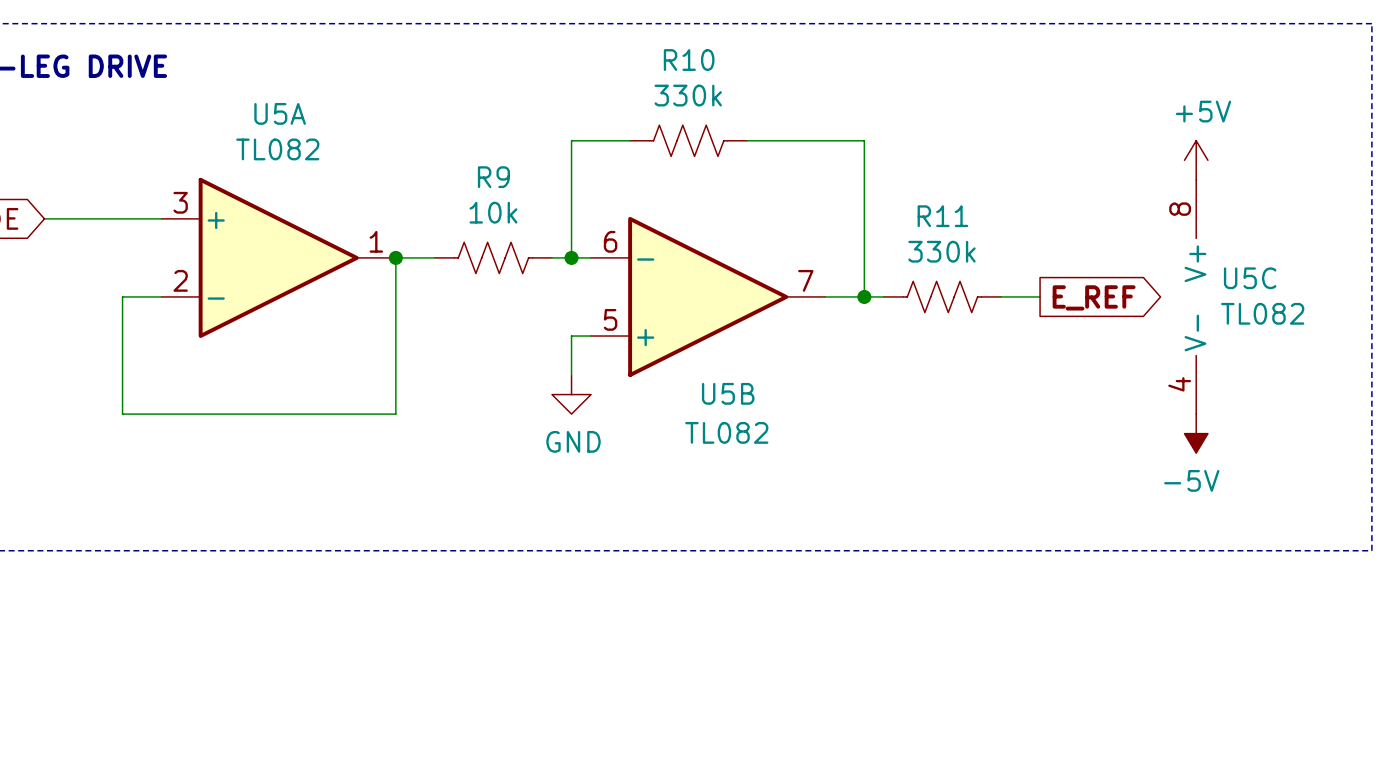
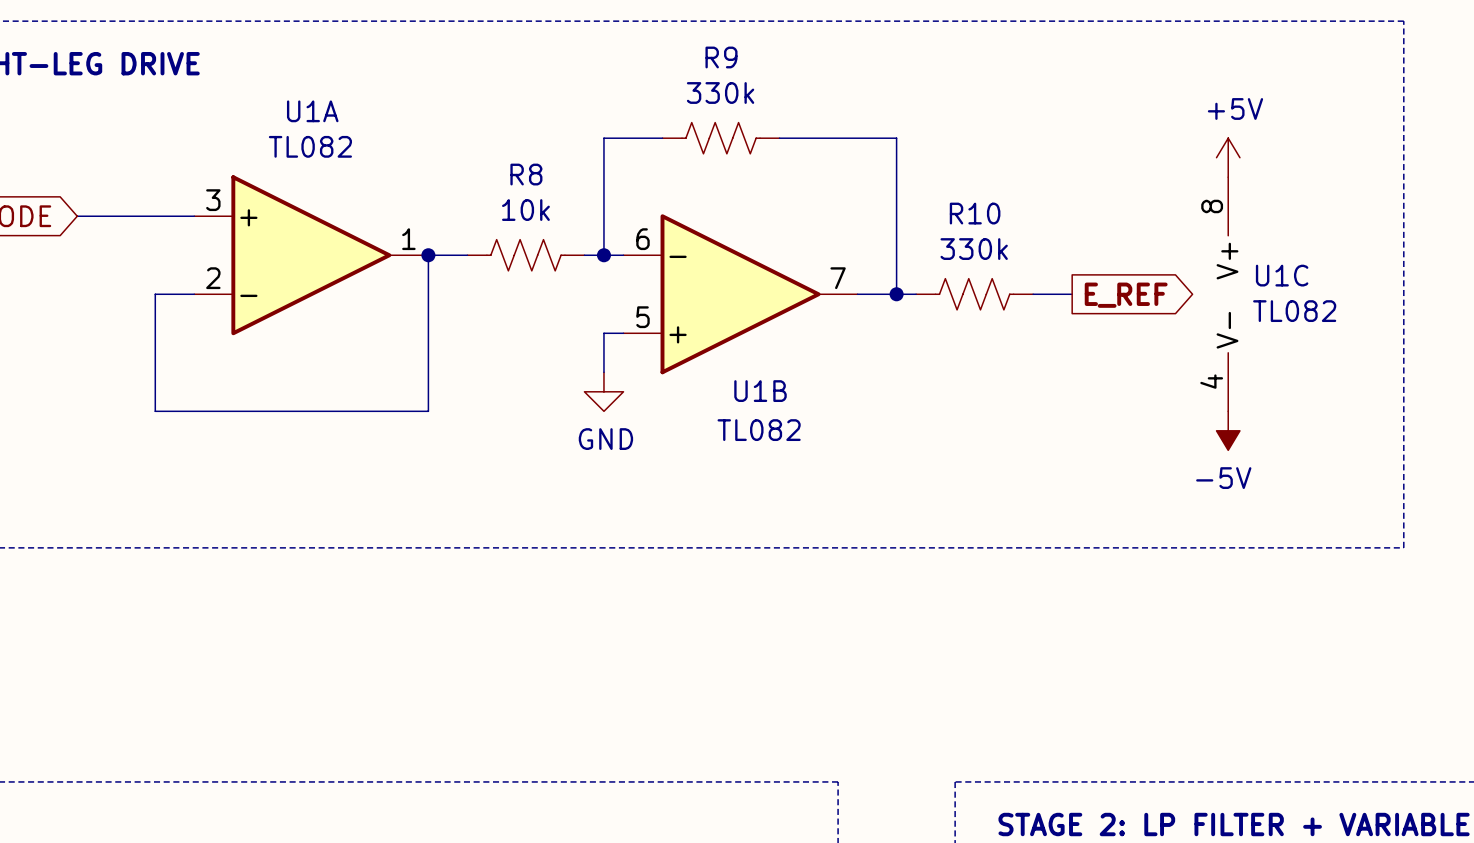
R10 name: R10 (689, 60) -> R9 (721, 57)
U5A name: U5A (280, 113) -> U1A (312, 111)
R9 name: R9 (493, 177) -> R8 (526, 174)
R11 name: R11 (942, 216) -> R10 (975, 213)
U5C name: U5C (1250, 278) -> U1C (1282, 275)
U5B name: U5B (728, 393) -> U1B (760, 391)

